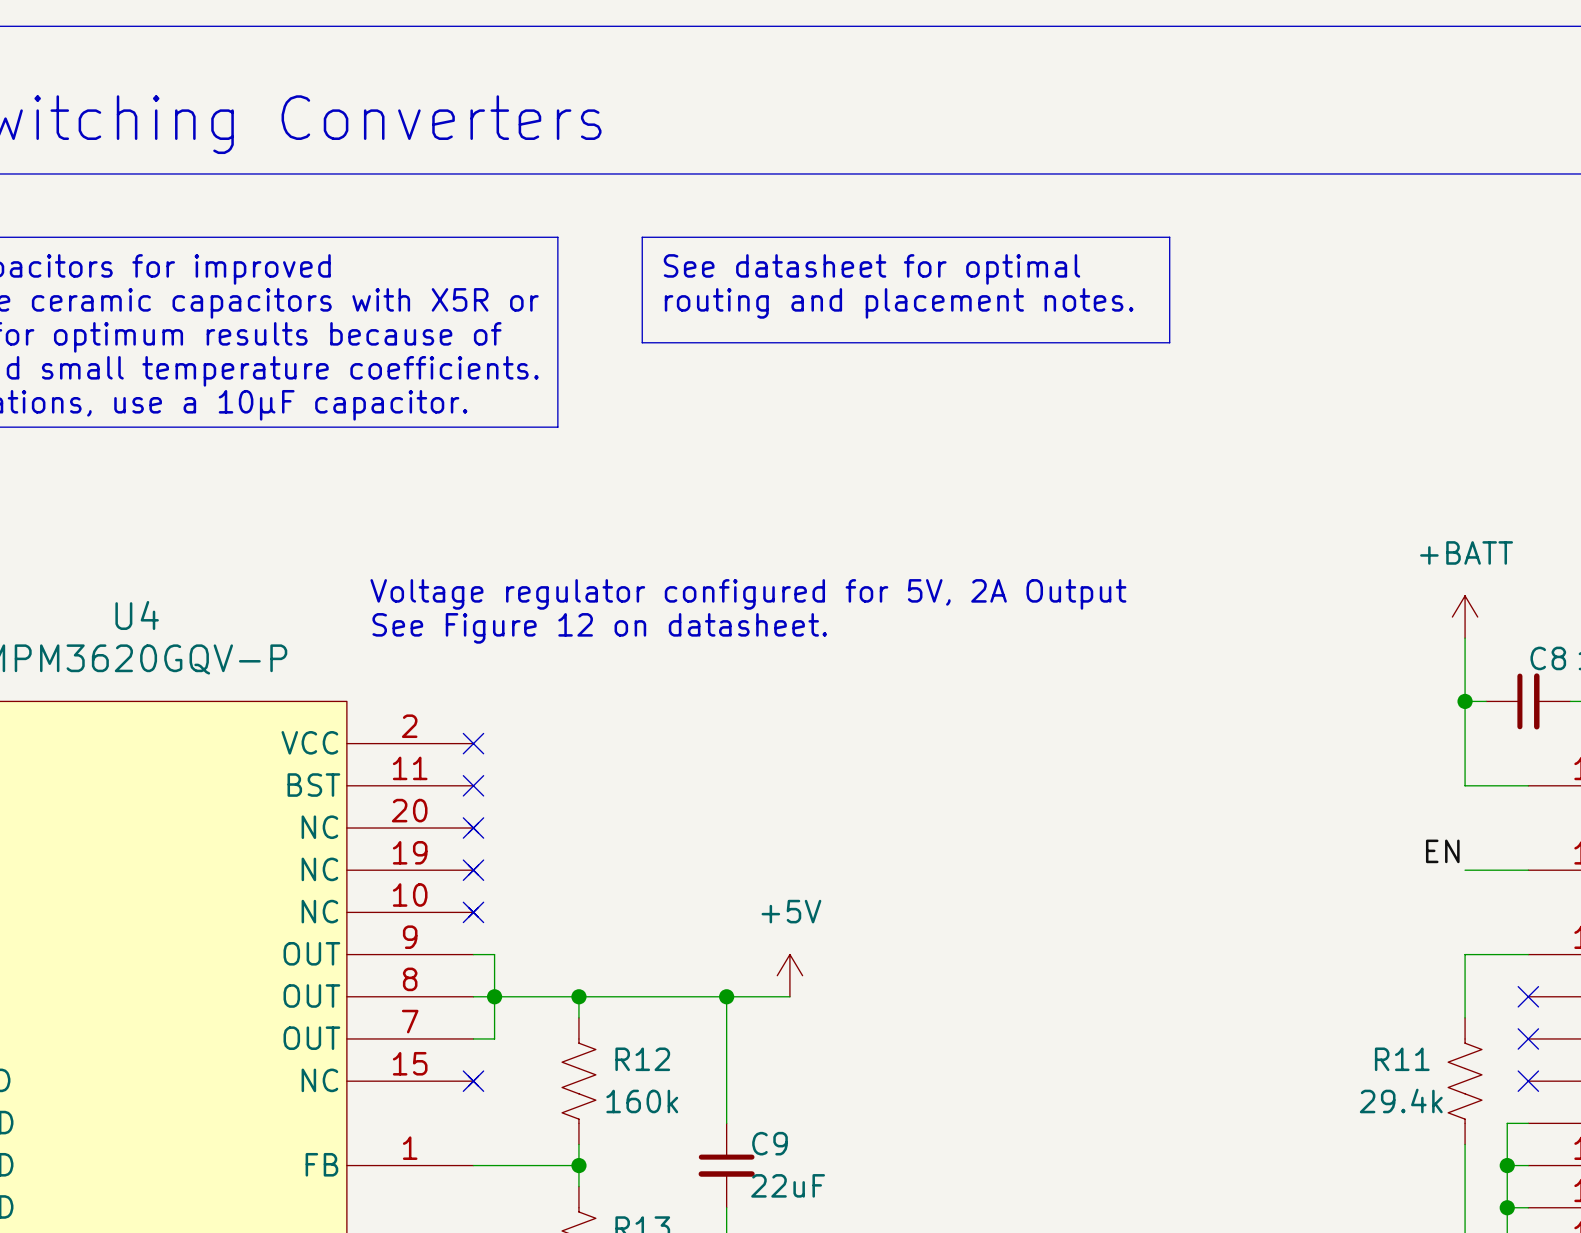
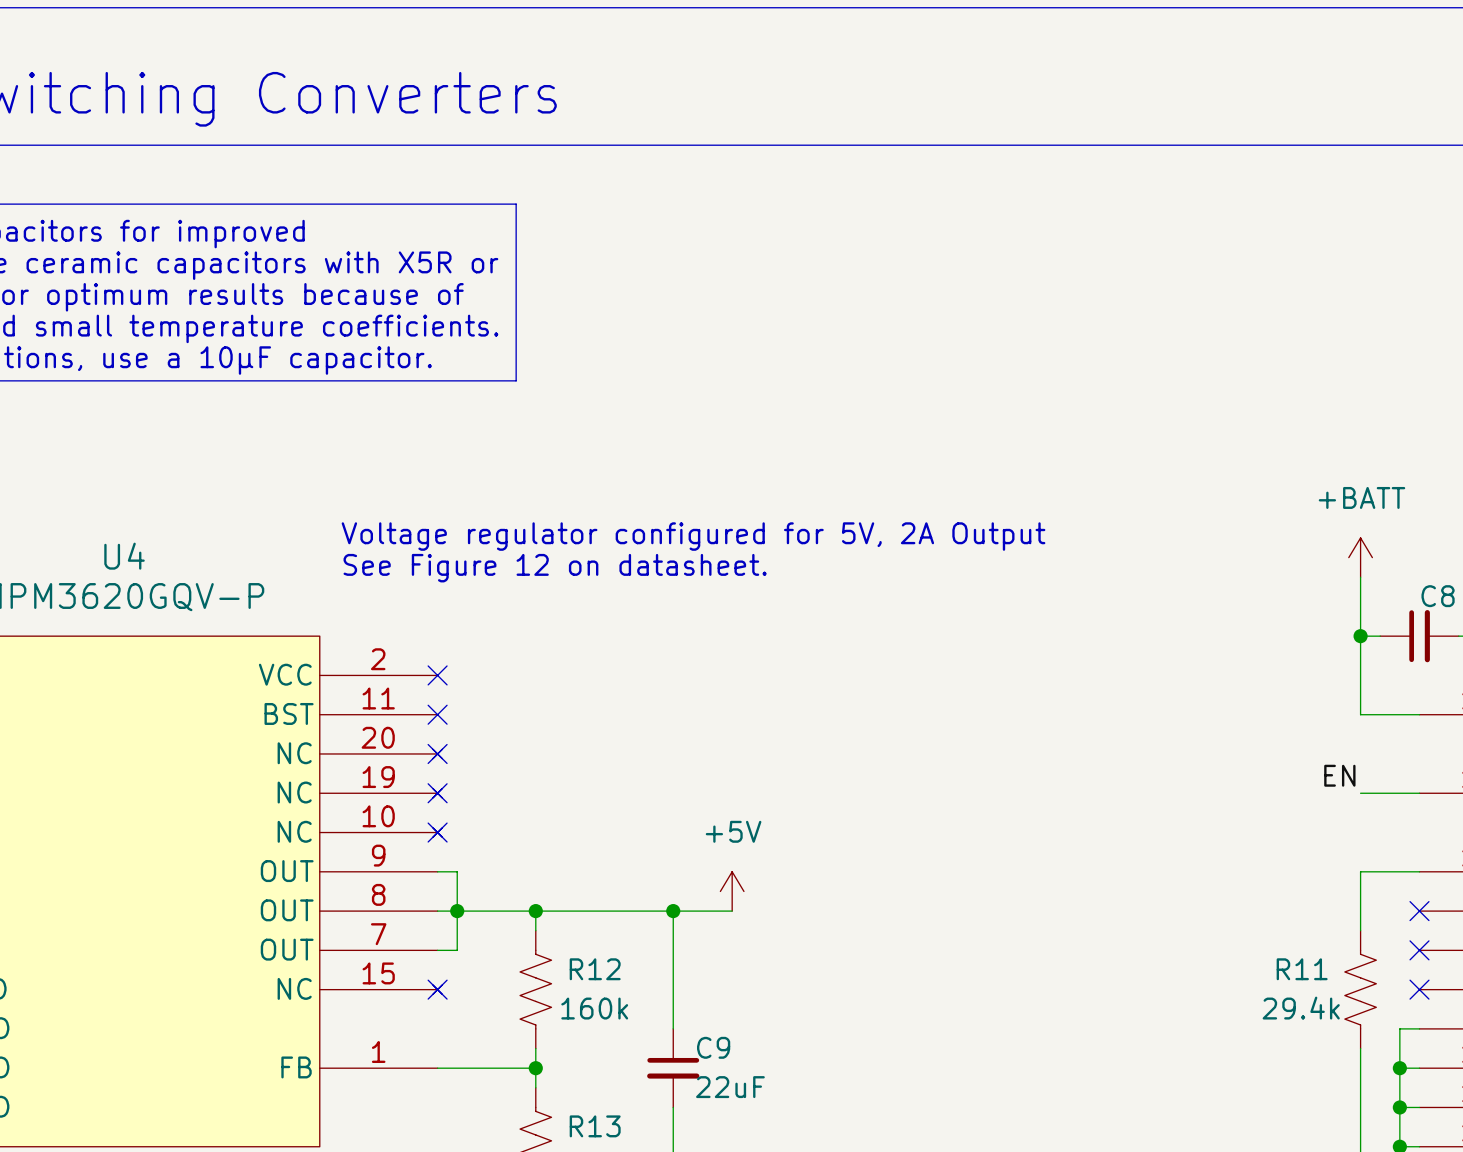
line: (642, 237) (1169, 237) (1169, 342) (642, 342) (642, 237) -> none
text: See datasheet for optimal (871, 269) -> none
text: routing and placement notes. (899, 303) -> none

